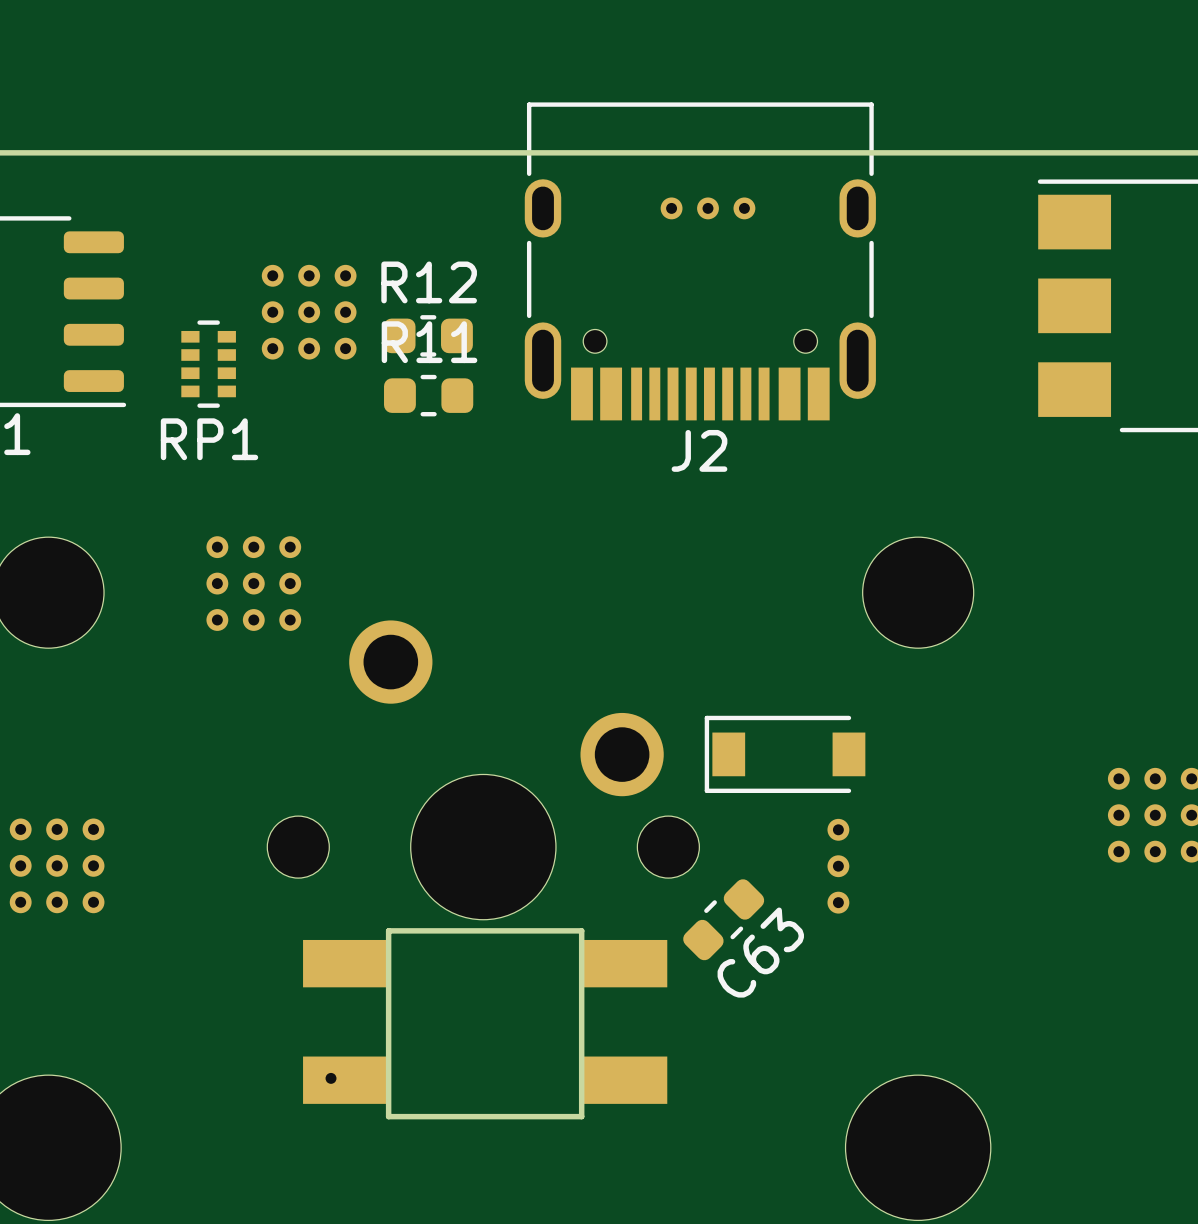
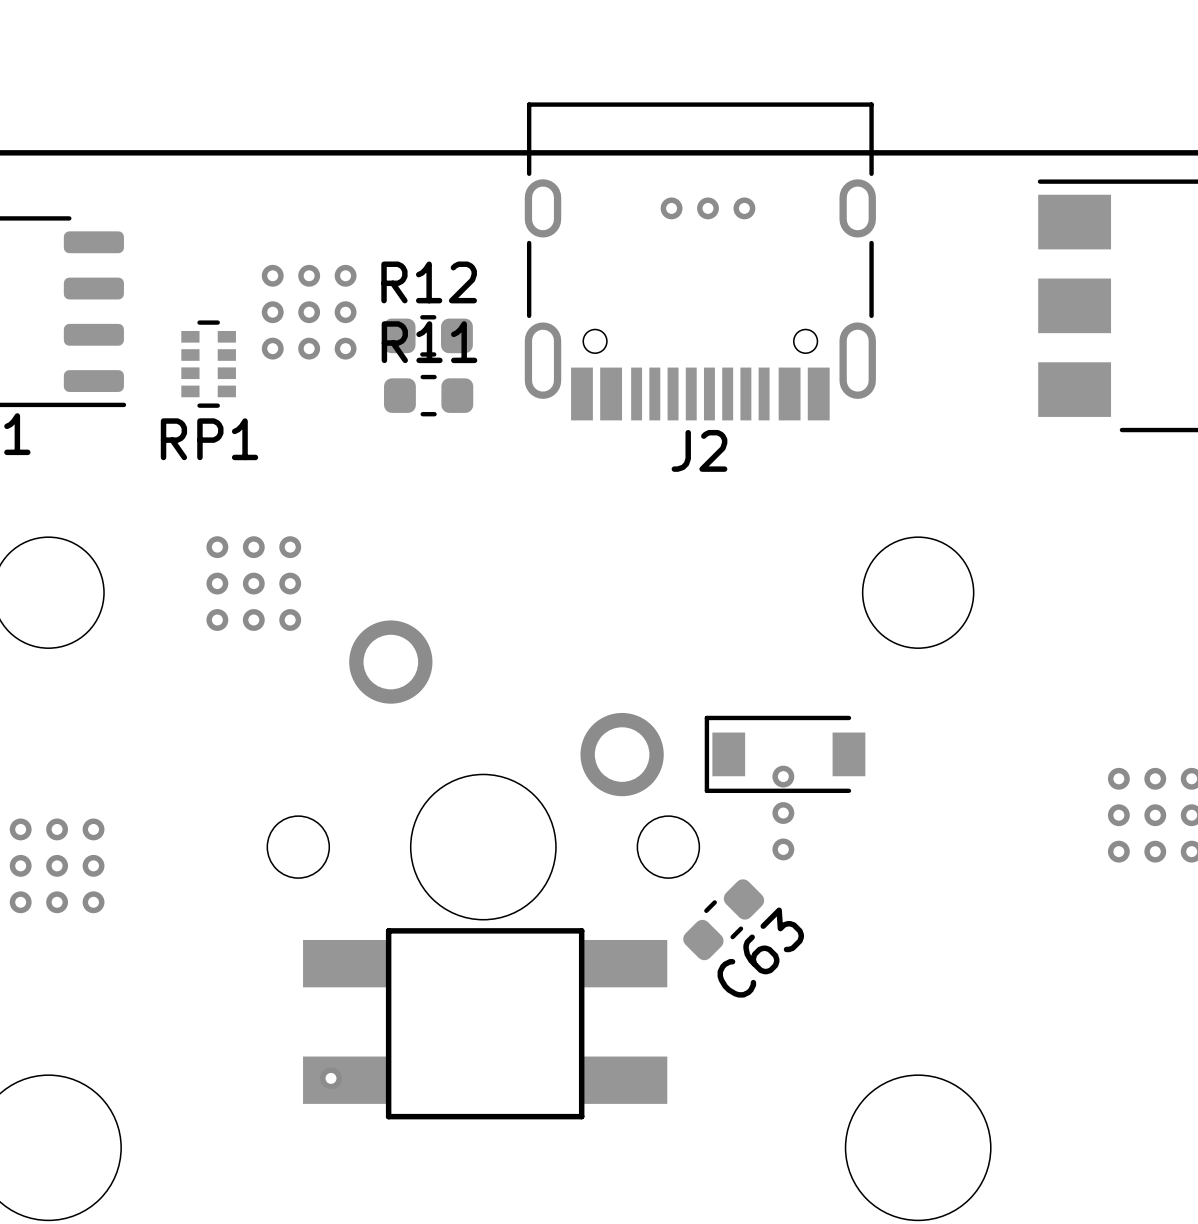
part: none -> (783, 776)
part: none -> (783, 813)
part: (838, 829) -> none
part: none -> (783, 849)
part: (838, 866) -> none
part: (838, 902) -> none

